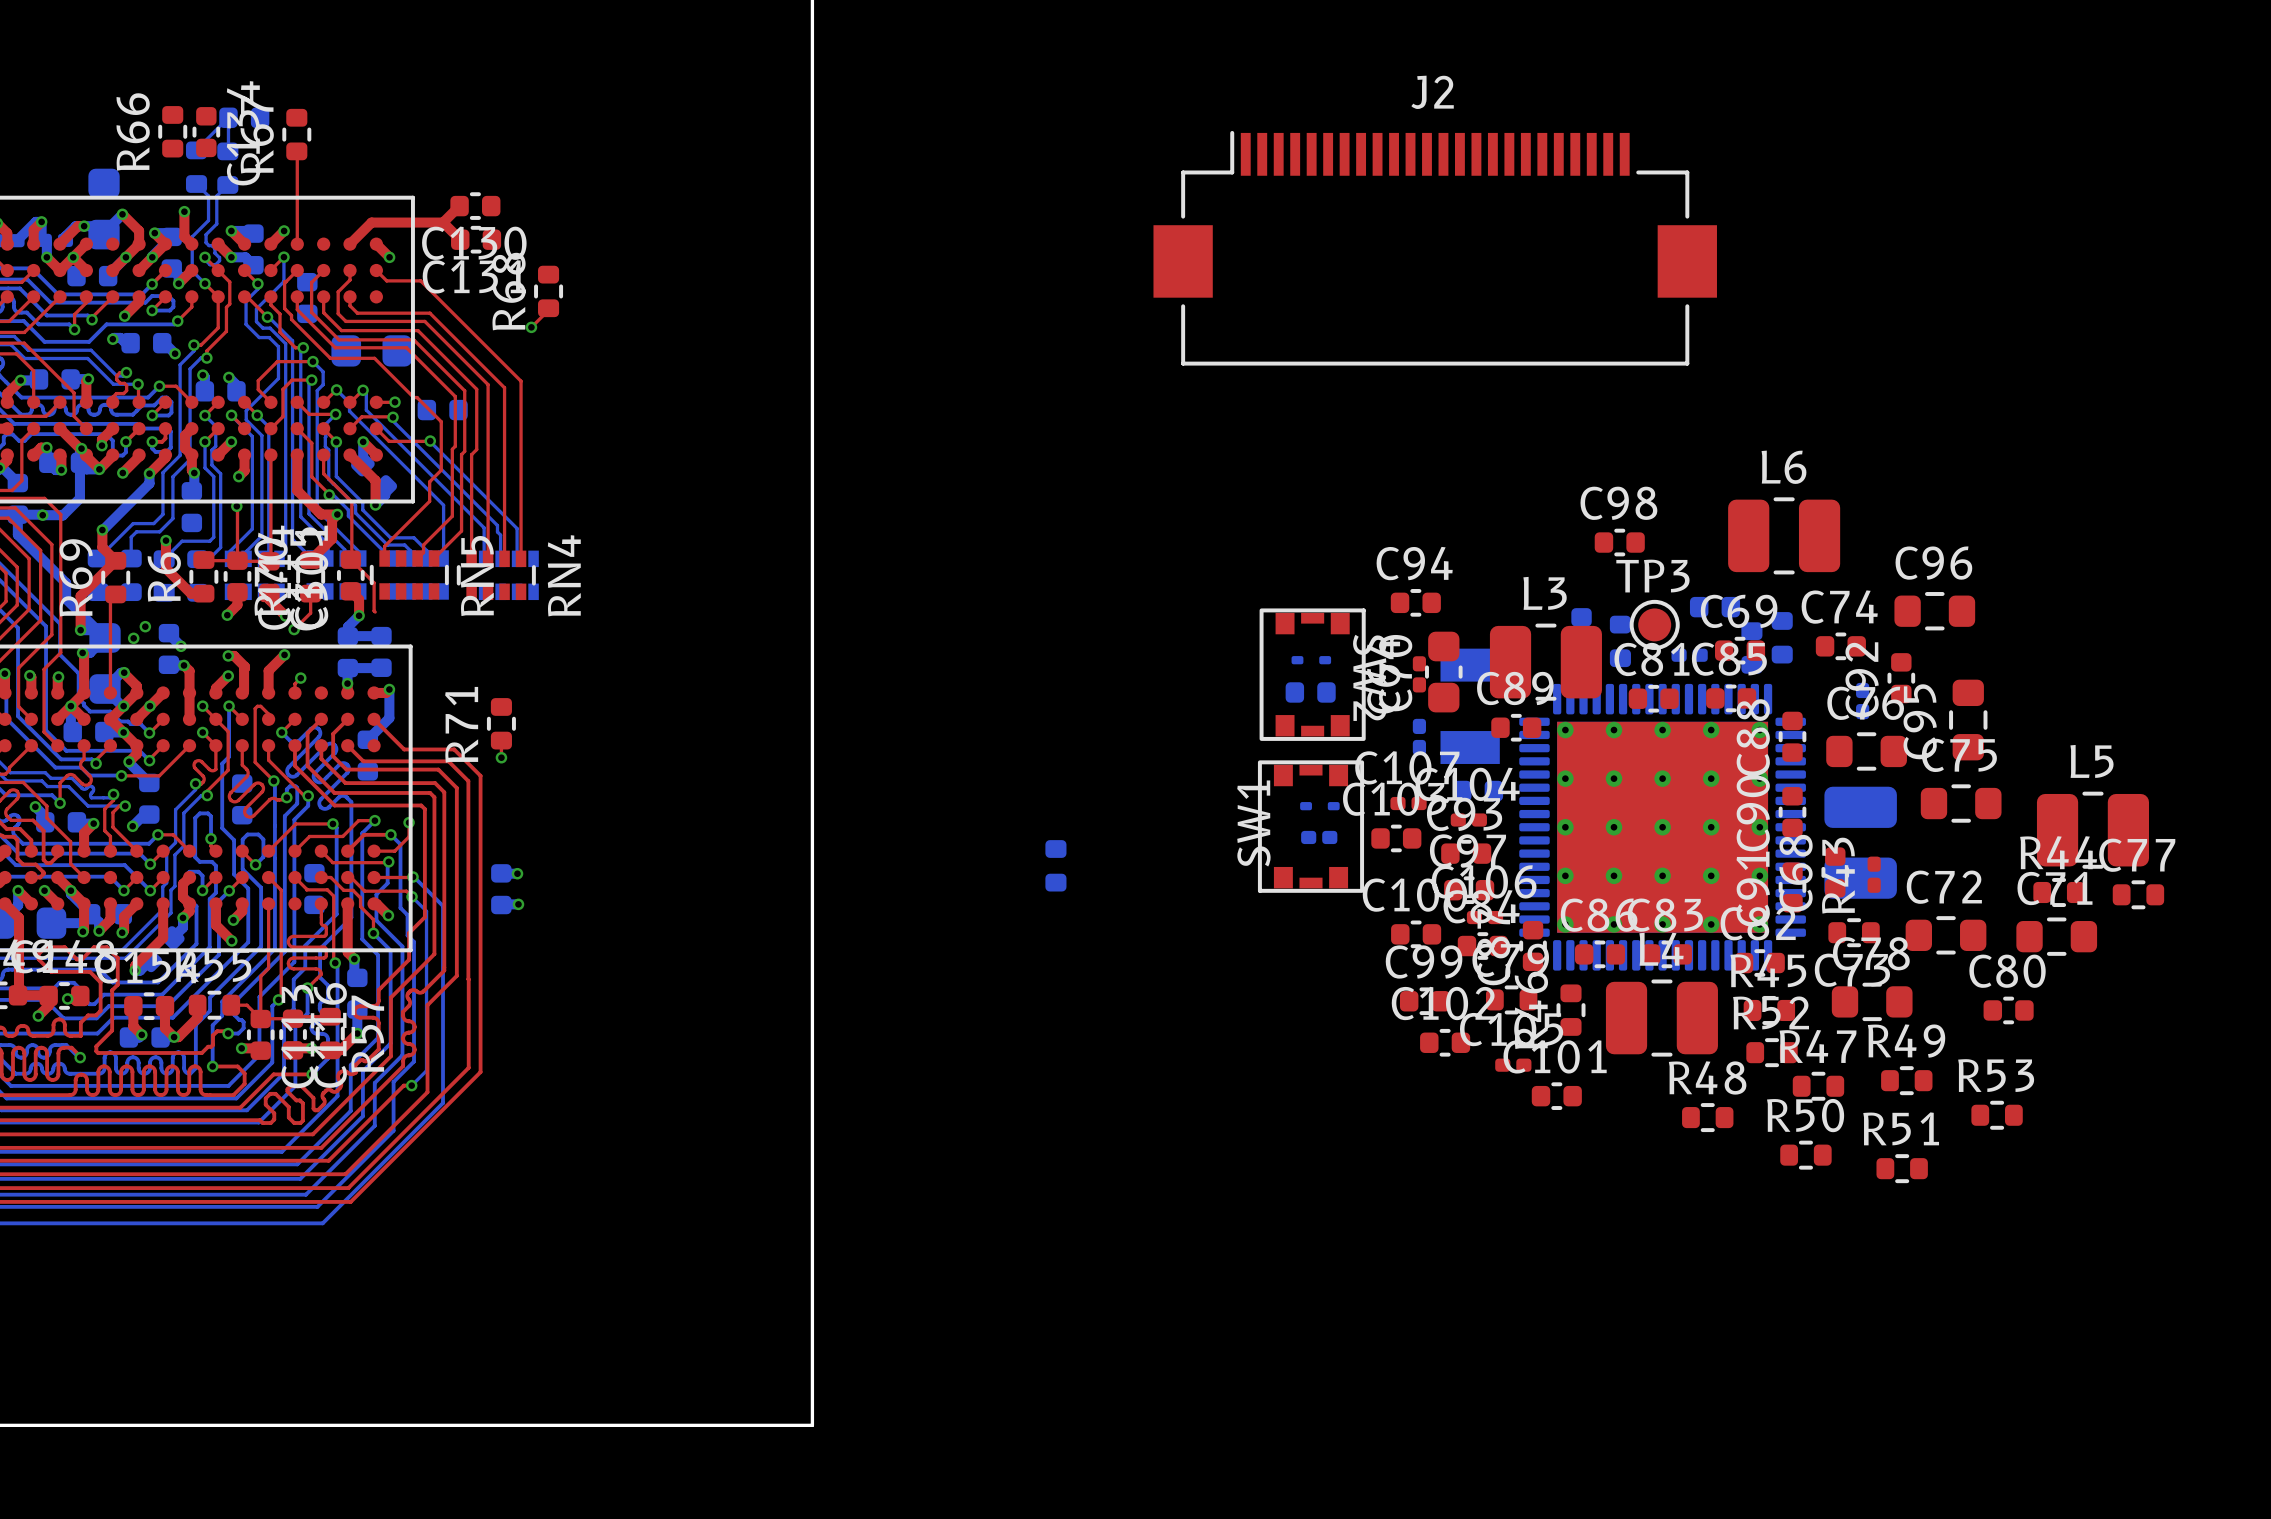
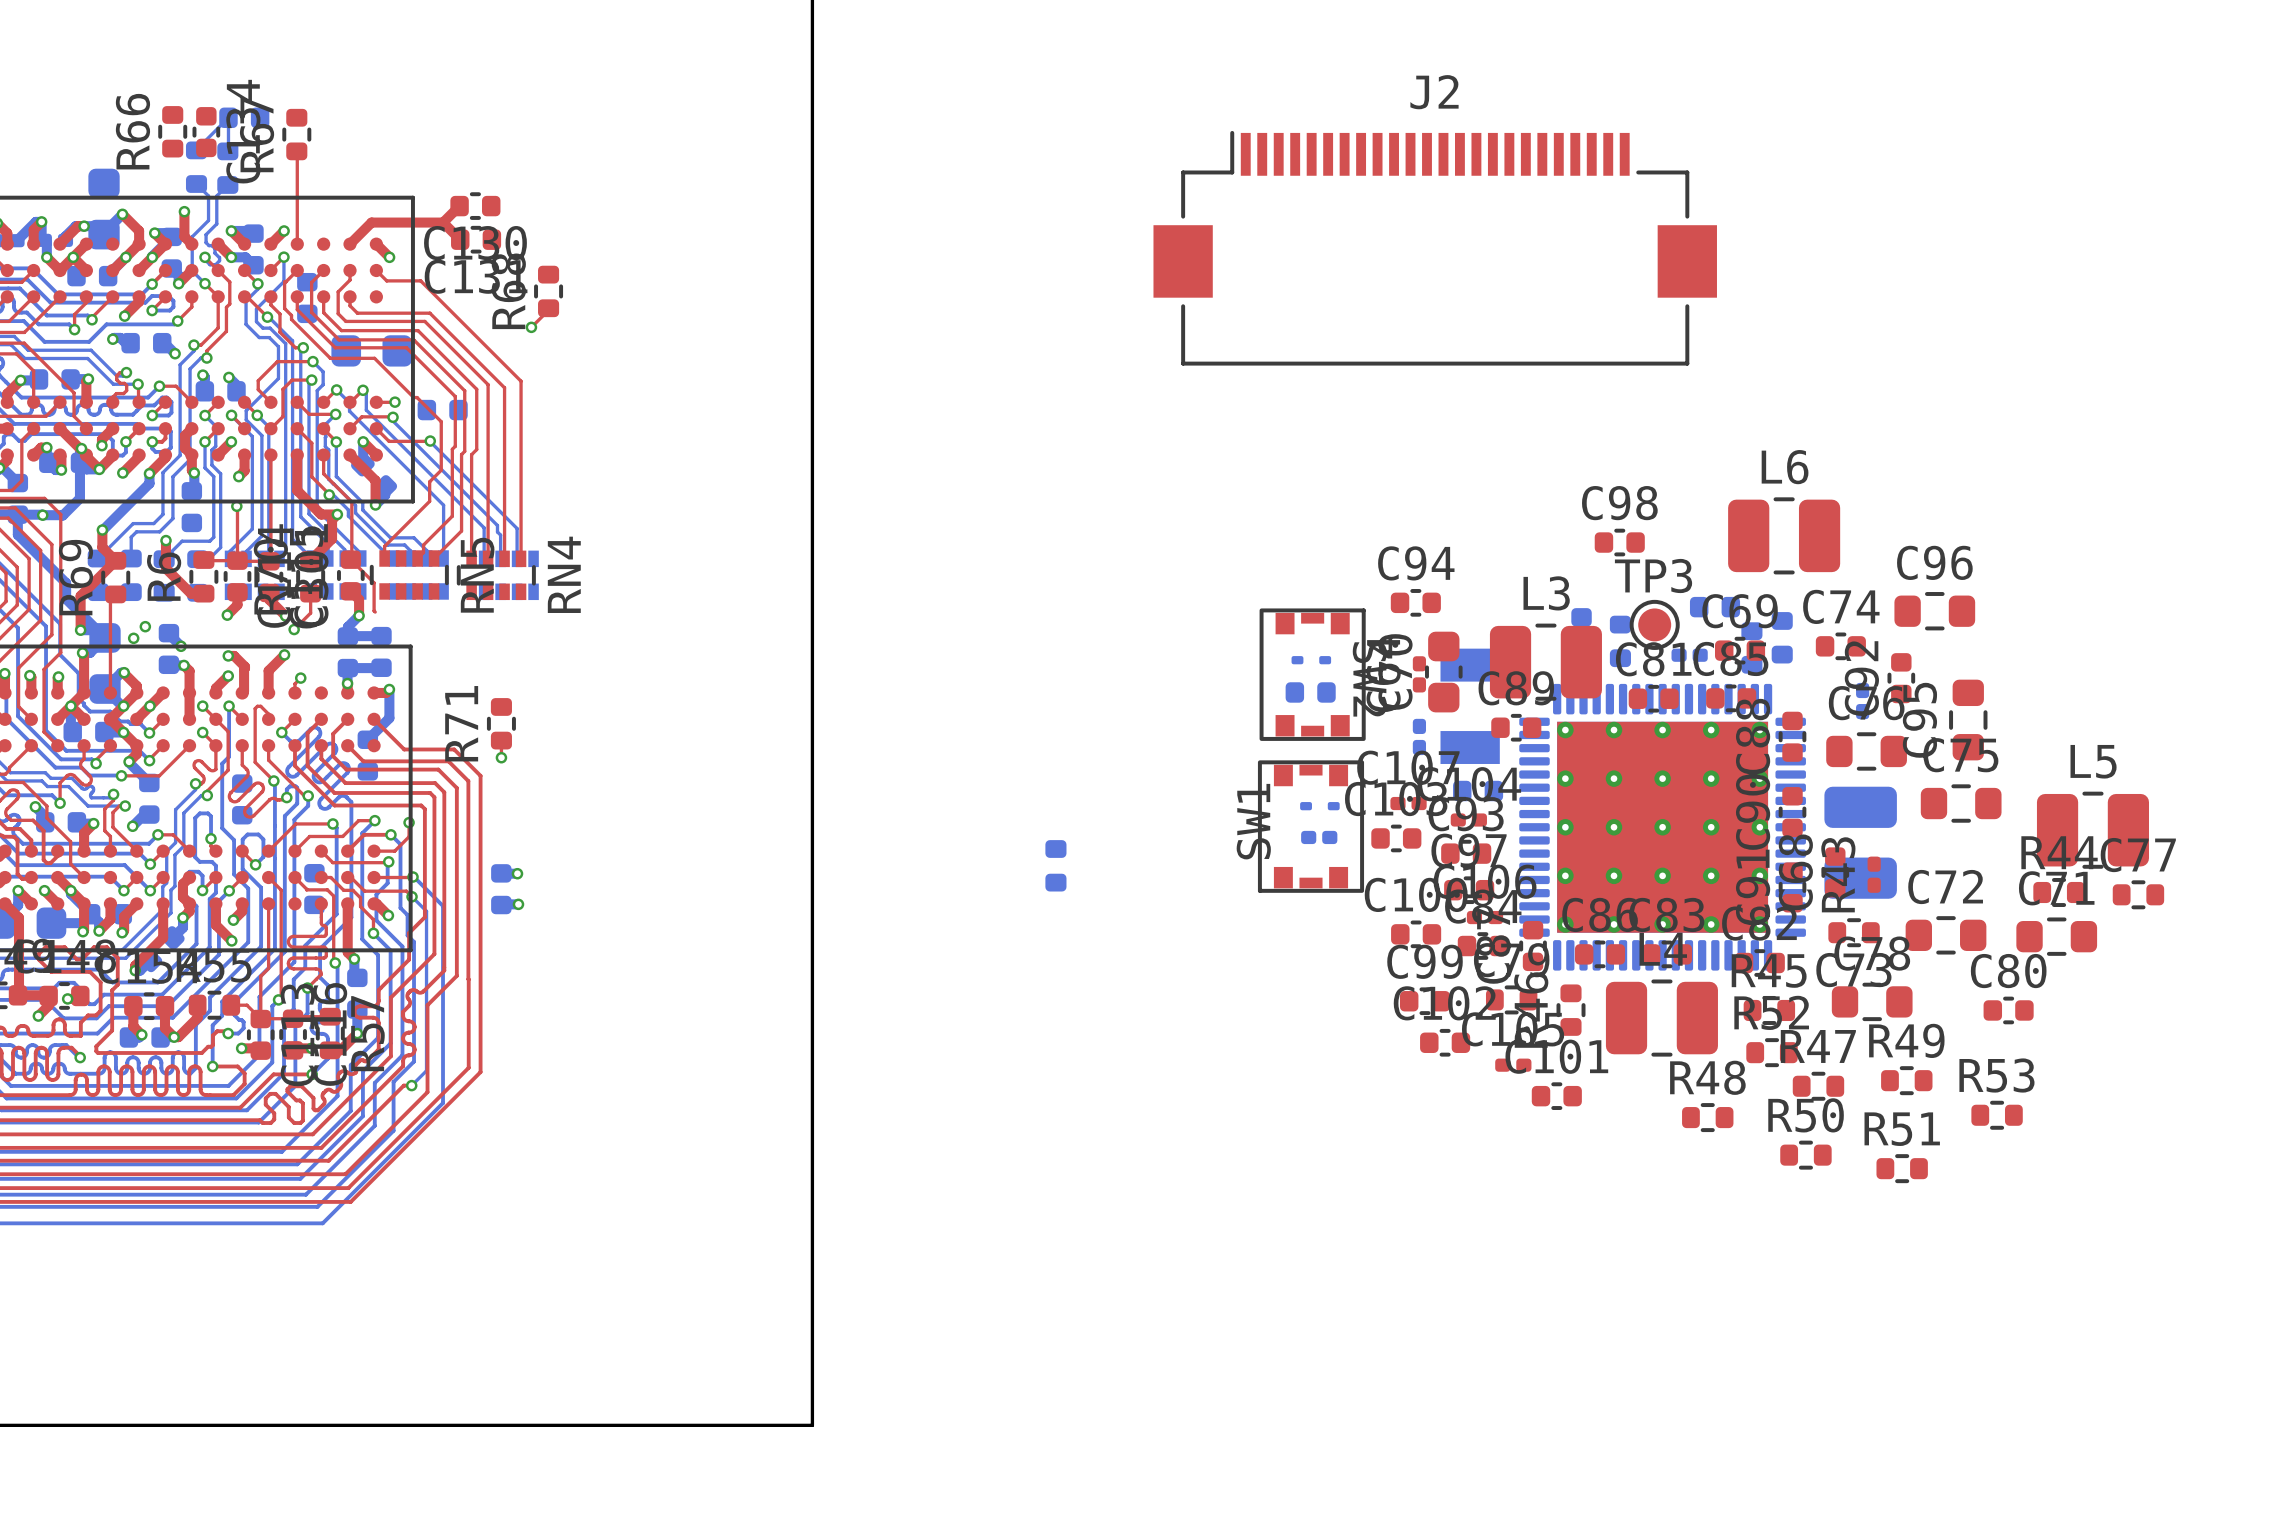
top track: (17, 858) (23, 864) (35, 864) (43, 872) (40, 877) (31, 877) -> (17, 858) (17, 874) (22, 878) (31, 877)

